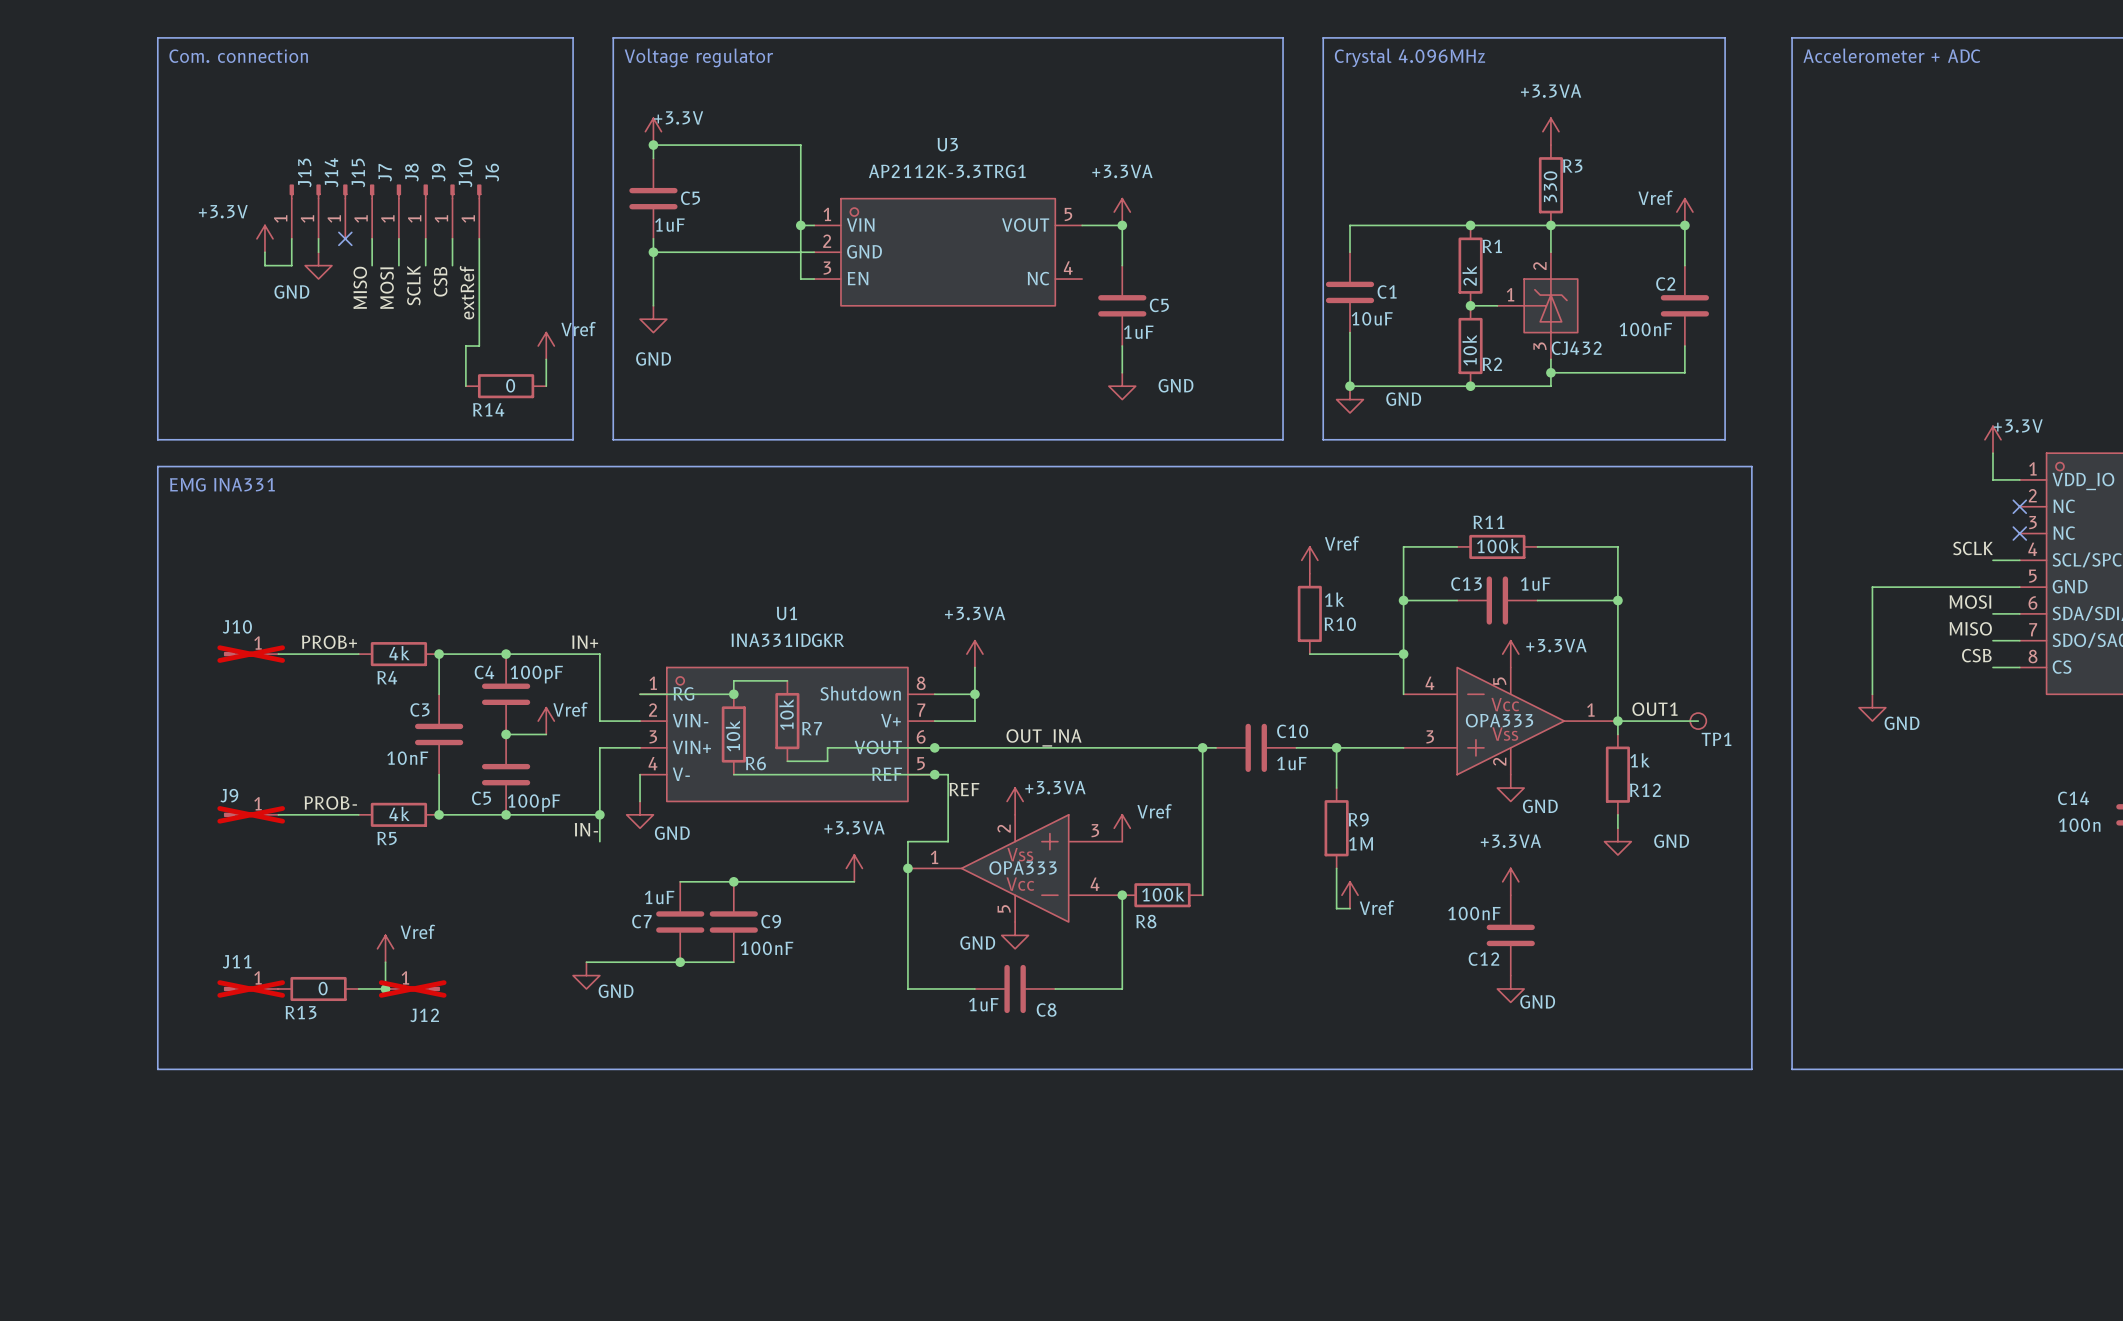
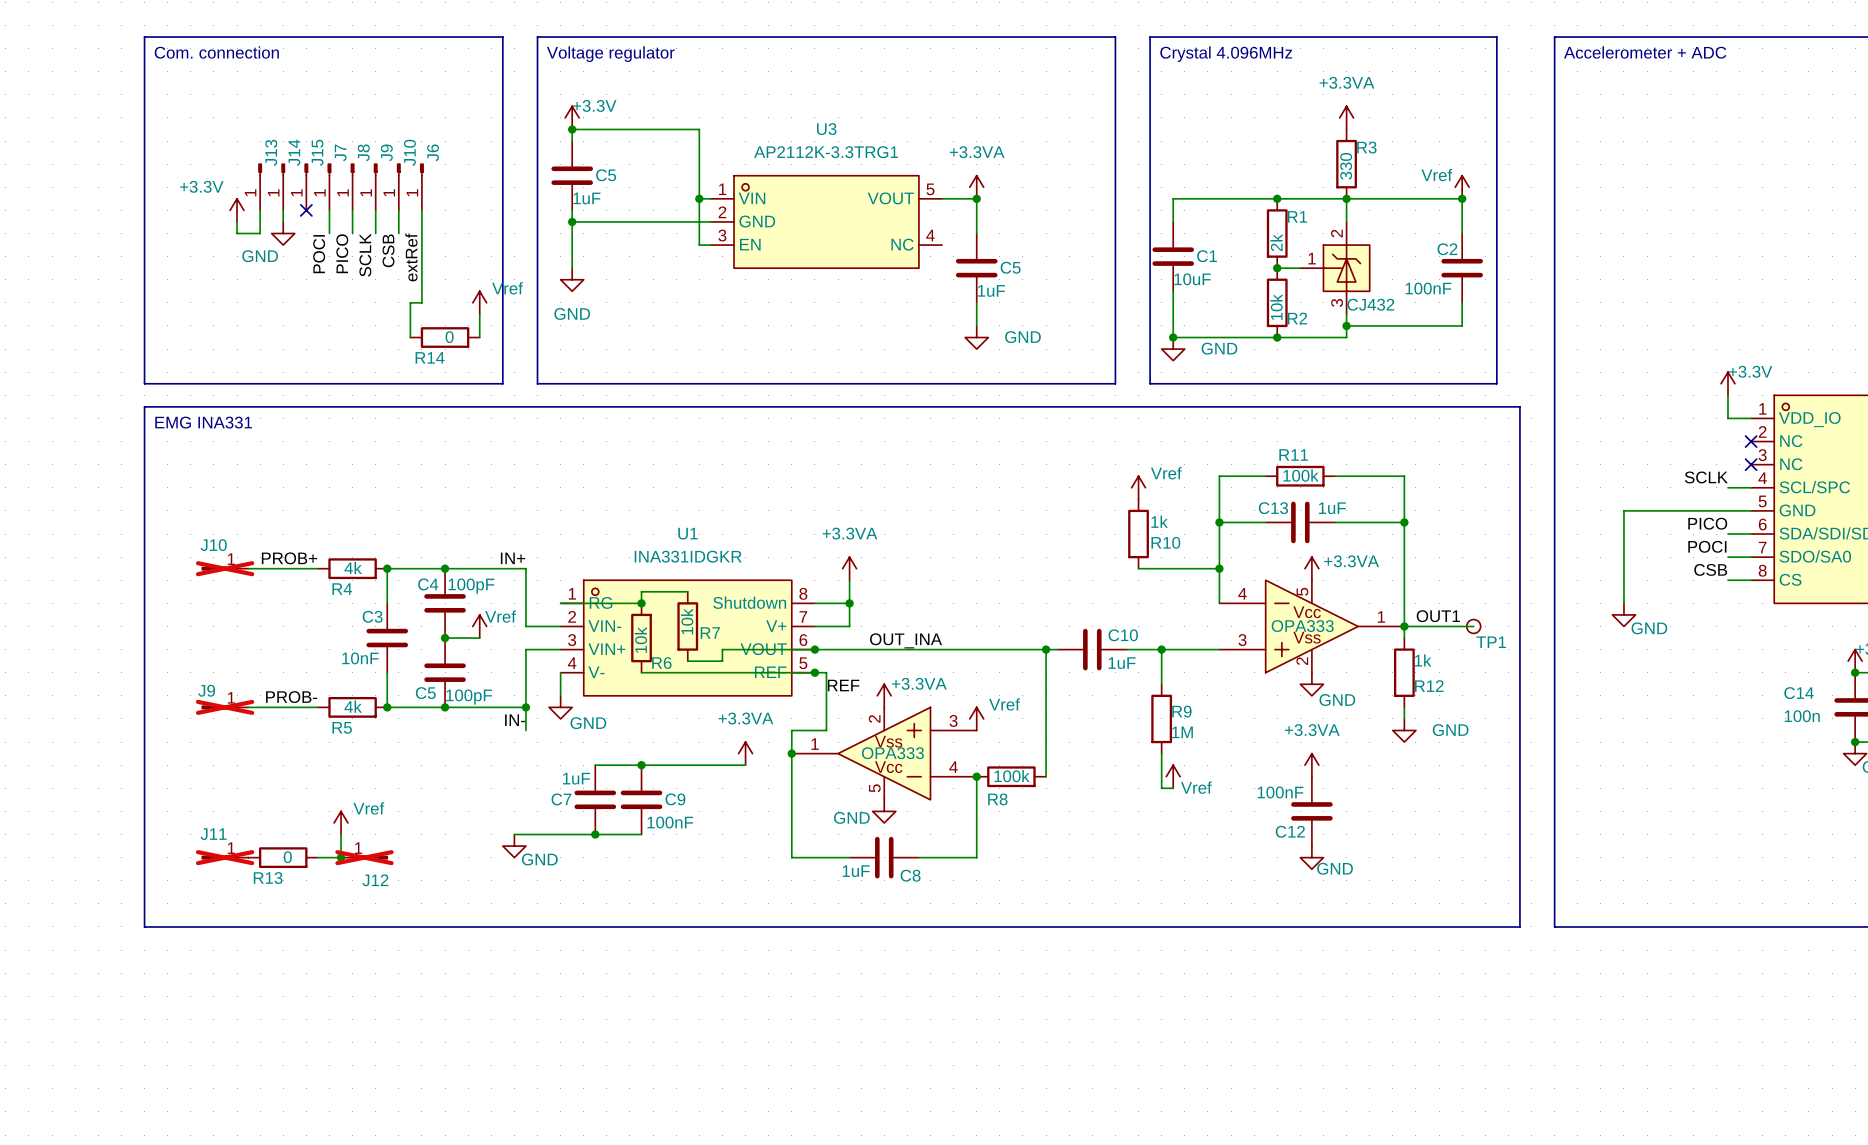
label: MISO (360, 287) -> POCI (319, 254)
label: MOSI (387, 288) -> PICO (342, 253)
label: MOSI (1970, 602) -> PICO (1707, 523)
label: MISO (1970, 628) -> POCI (1707, 546)

